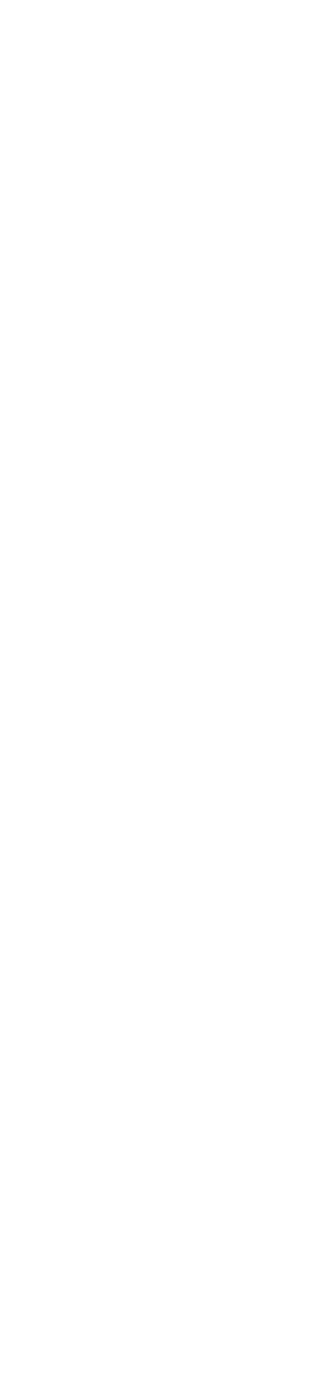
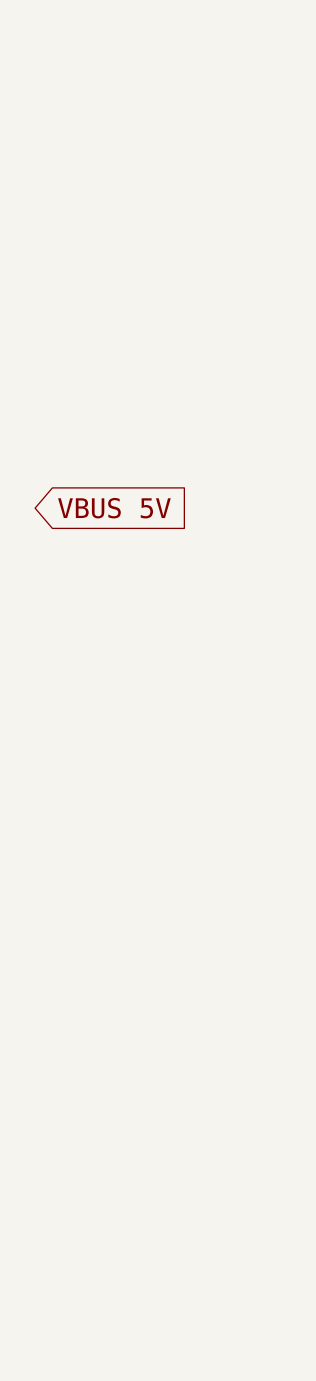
global label: none -> VBUS 5V (114, 508)

